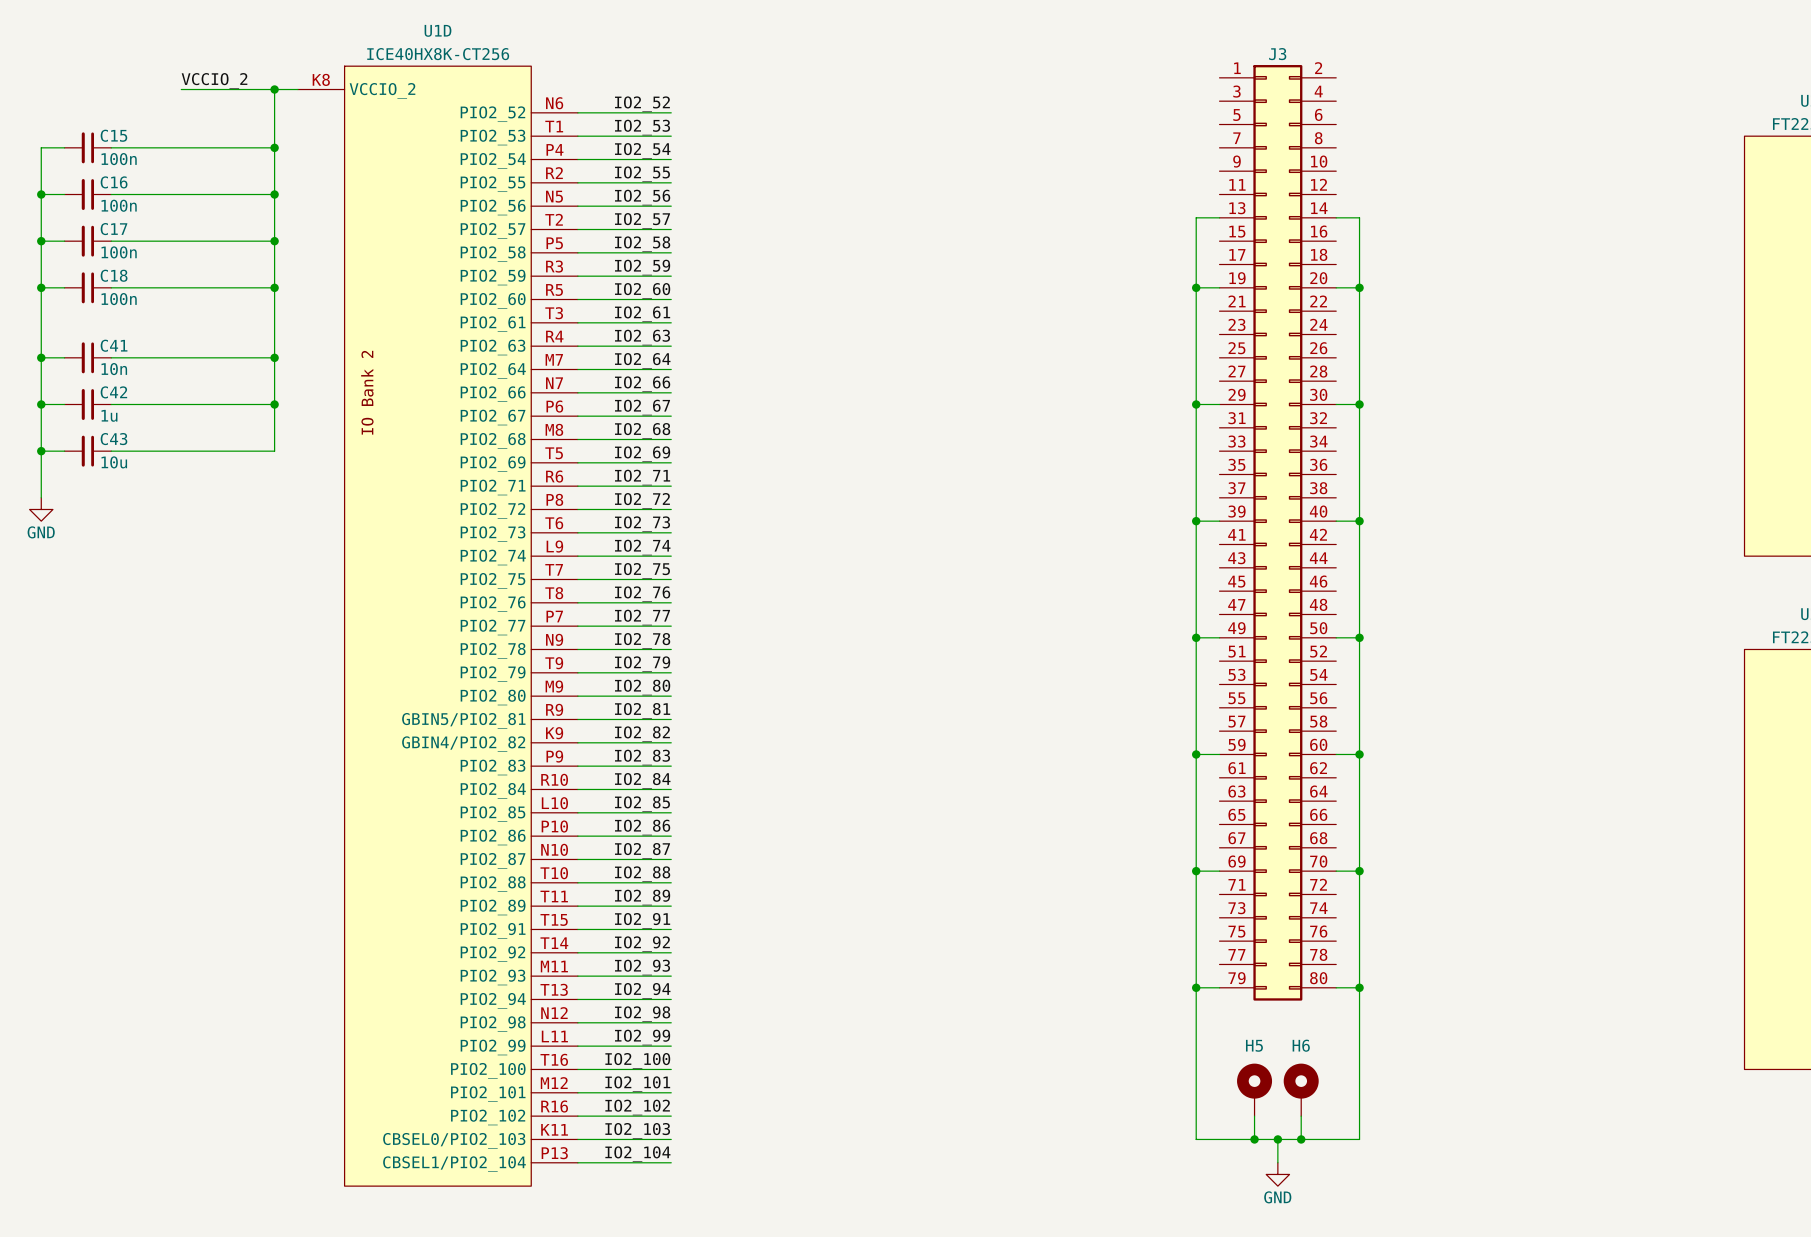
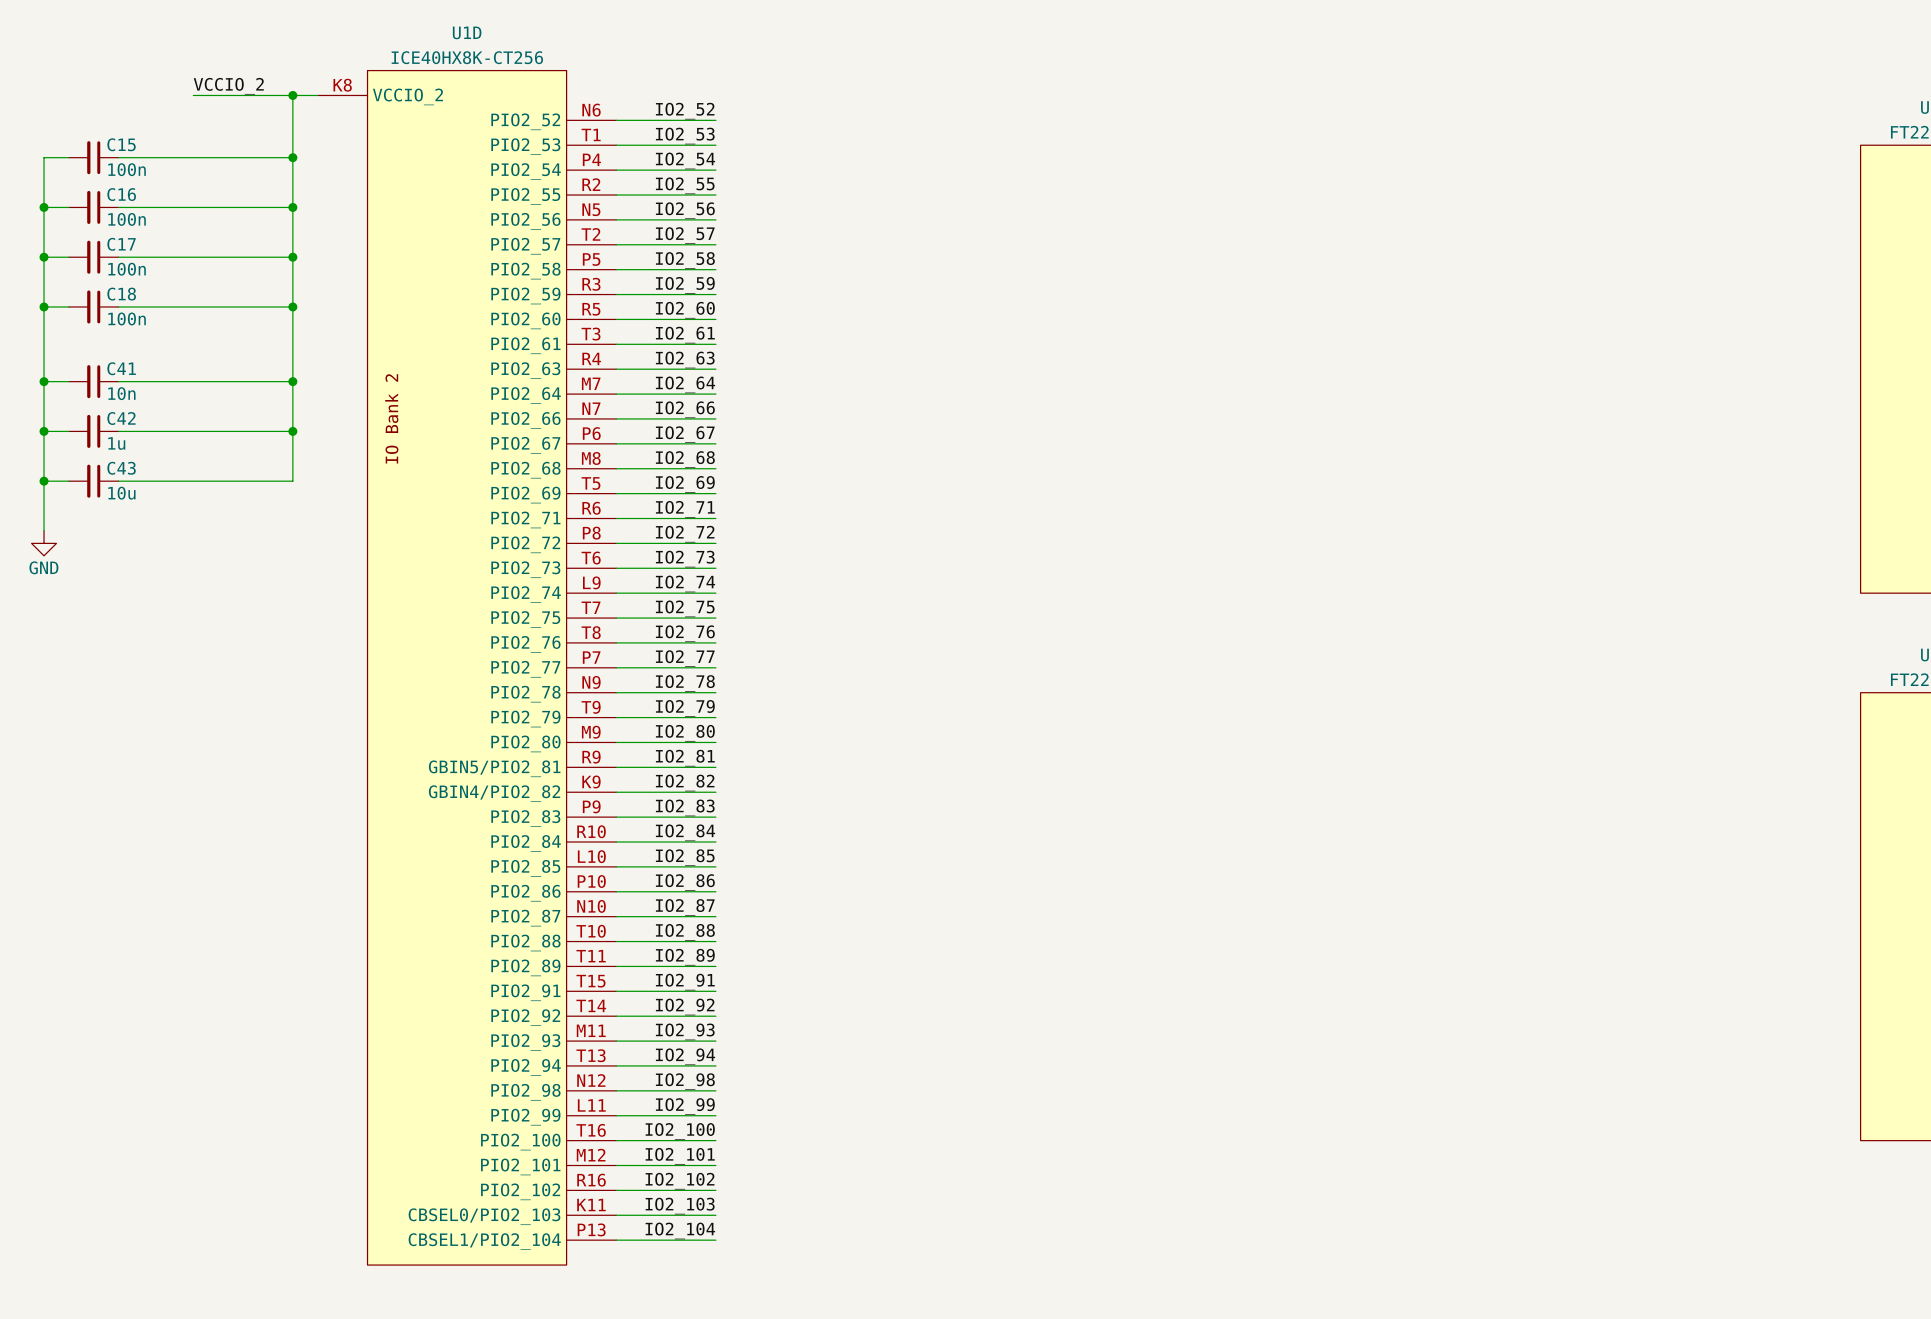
wire: (1219, 217) (1196, 217) (1196, 1139) (1359, 1139) (1359, 217) (1336, 217) -> none
wire: (1196, 287) (1219, 287) -> none
junction: (1196, 287) -> none
wire: (1336, 287) (1359, 287) -> none
junction: (1359, 287) -> none
wire: (1196, 404) (1219, 404) -> none
junction: (1196, 404) -> none
wire: (1336, 404) (1359, 404) -> none
junction: (1359, 404) -> none
wire: (1196, 521) (1219, 521) -> none
junction: (1196, 521) -> none
wire: (1336, 521) (1359, 521) -> none
junction: (1359, 521) -> none
J3: (1277, 532) -> none
wire: (1196, 637) (1219, 637) -> none
junction: (1196, 637) -> none
wire: (1336, 637) (1359, 637) -> none
junction: (1359, 637) -> none
wire: (1196, 754) (1219, 754) -> none
junction: (1196, 754) -> none
wire: (1336, 754) (1359, 754) -> none
junction: (1359, 754) -> none
wire: (1196, 871) (1219, 871) -> none
junction: (1196, 871) -> none
wire: (1336, 871) (1359, 871) -> none
junction: (1359, 871) -> none
wire: (1196, 987) (1219, 987) -> none
junction: (1196, 987) -> none
wire: (1336, 987) (1359, 987) -> none
junction: (1359, 987) -> none
H5: (1254, 1089) -> none
H6: (1301, 1089) -> none
wire: (1254, 1116) (1254, 1139) -> none
wire: (1301, 1116) (1301, 1139) -> none
junction: (1254, 1139) -> none
wire: (1277, 1139) (1277, 1162) -> none
junction: (1277, 1139) -> none
junction: (1301, 1139) -> none
power symbol: GND (1277, 1174) -> none

